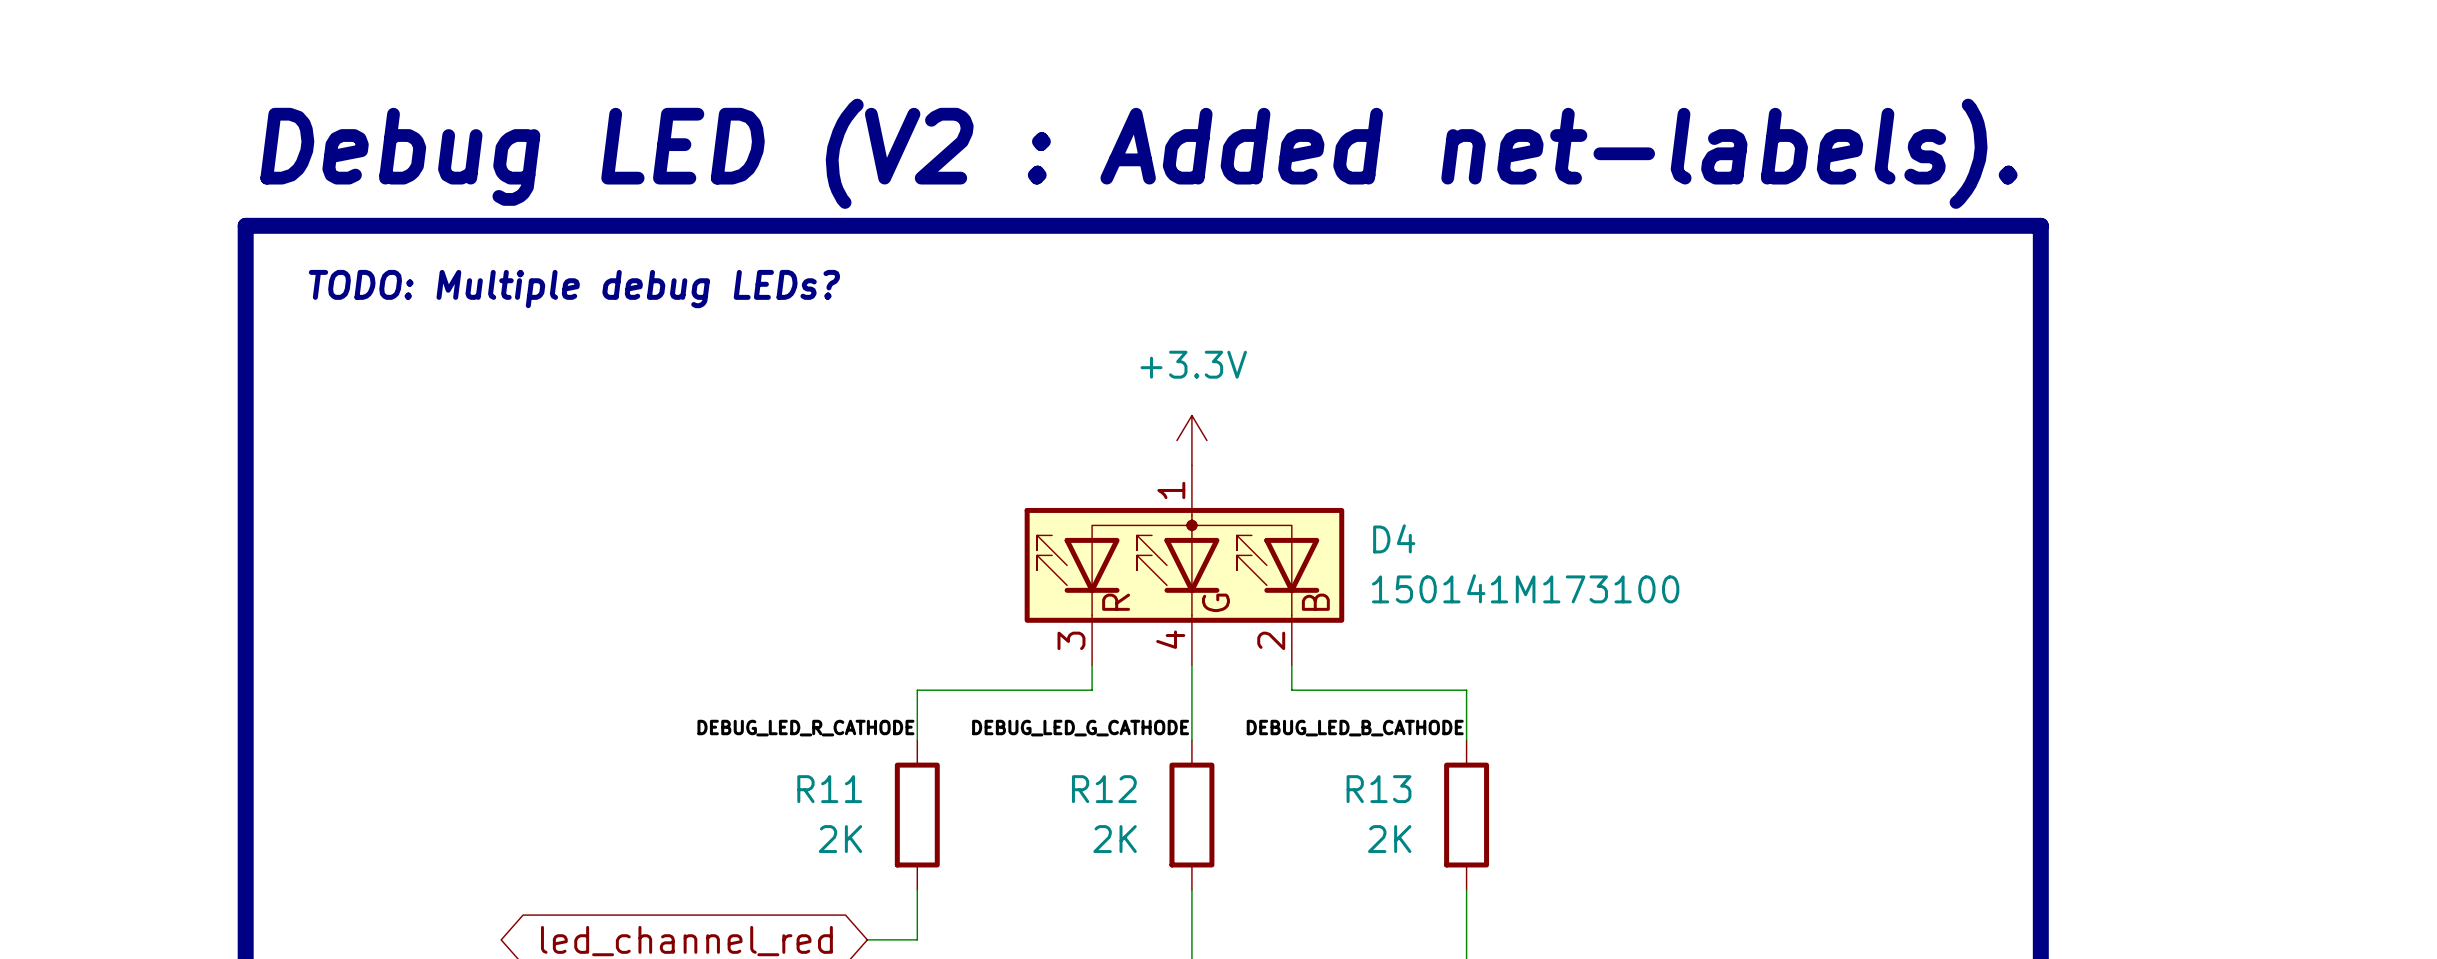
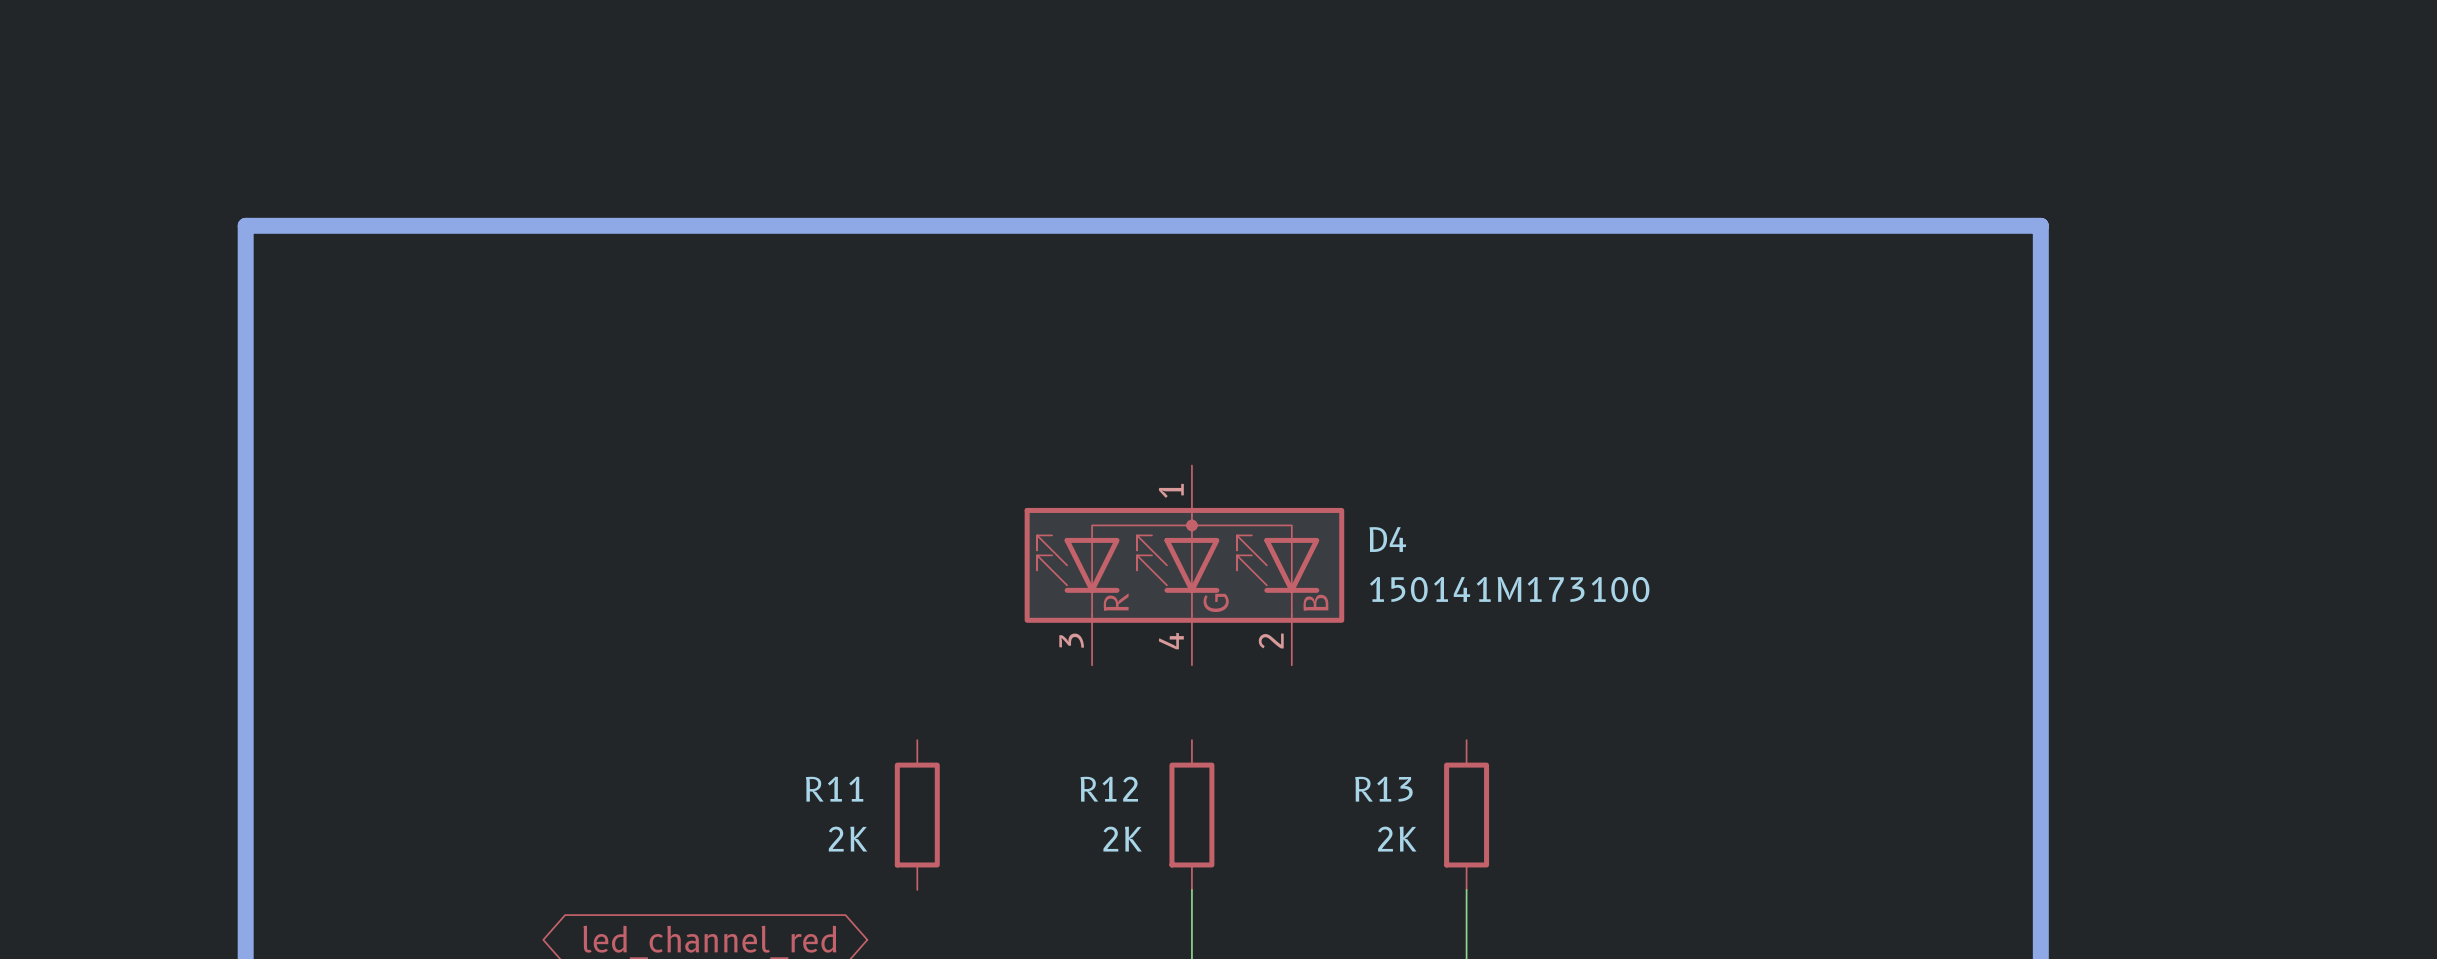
text: Debug LED (V2 : Added net-labels). (1139, 153) -> none
text: TODO: Multiple debug LEDs? (574, 289) -> none
power symbol: +3.3V (1191, 440) -> none
wire: (1092, 665) (1092, 690) (917, 690) (917, 740) -> none
wire: (1191, 665) (1191, 740) -> none
wire: (1291, 665) (1291, 690) (1466, 690) (1466, 740) -> none
label: DEBUG_LED_R_CATHODE (805, 728) -> none
label: DEBUG_LED_G_CATHODE (1080, 728) -> none
label: DEBUG_LED_B_CATHODE (1355, 728) -> none
wire: (917, 889) (917, 939) (867, 939) -> none

